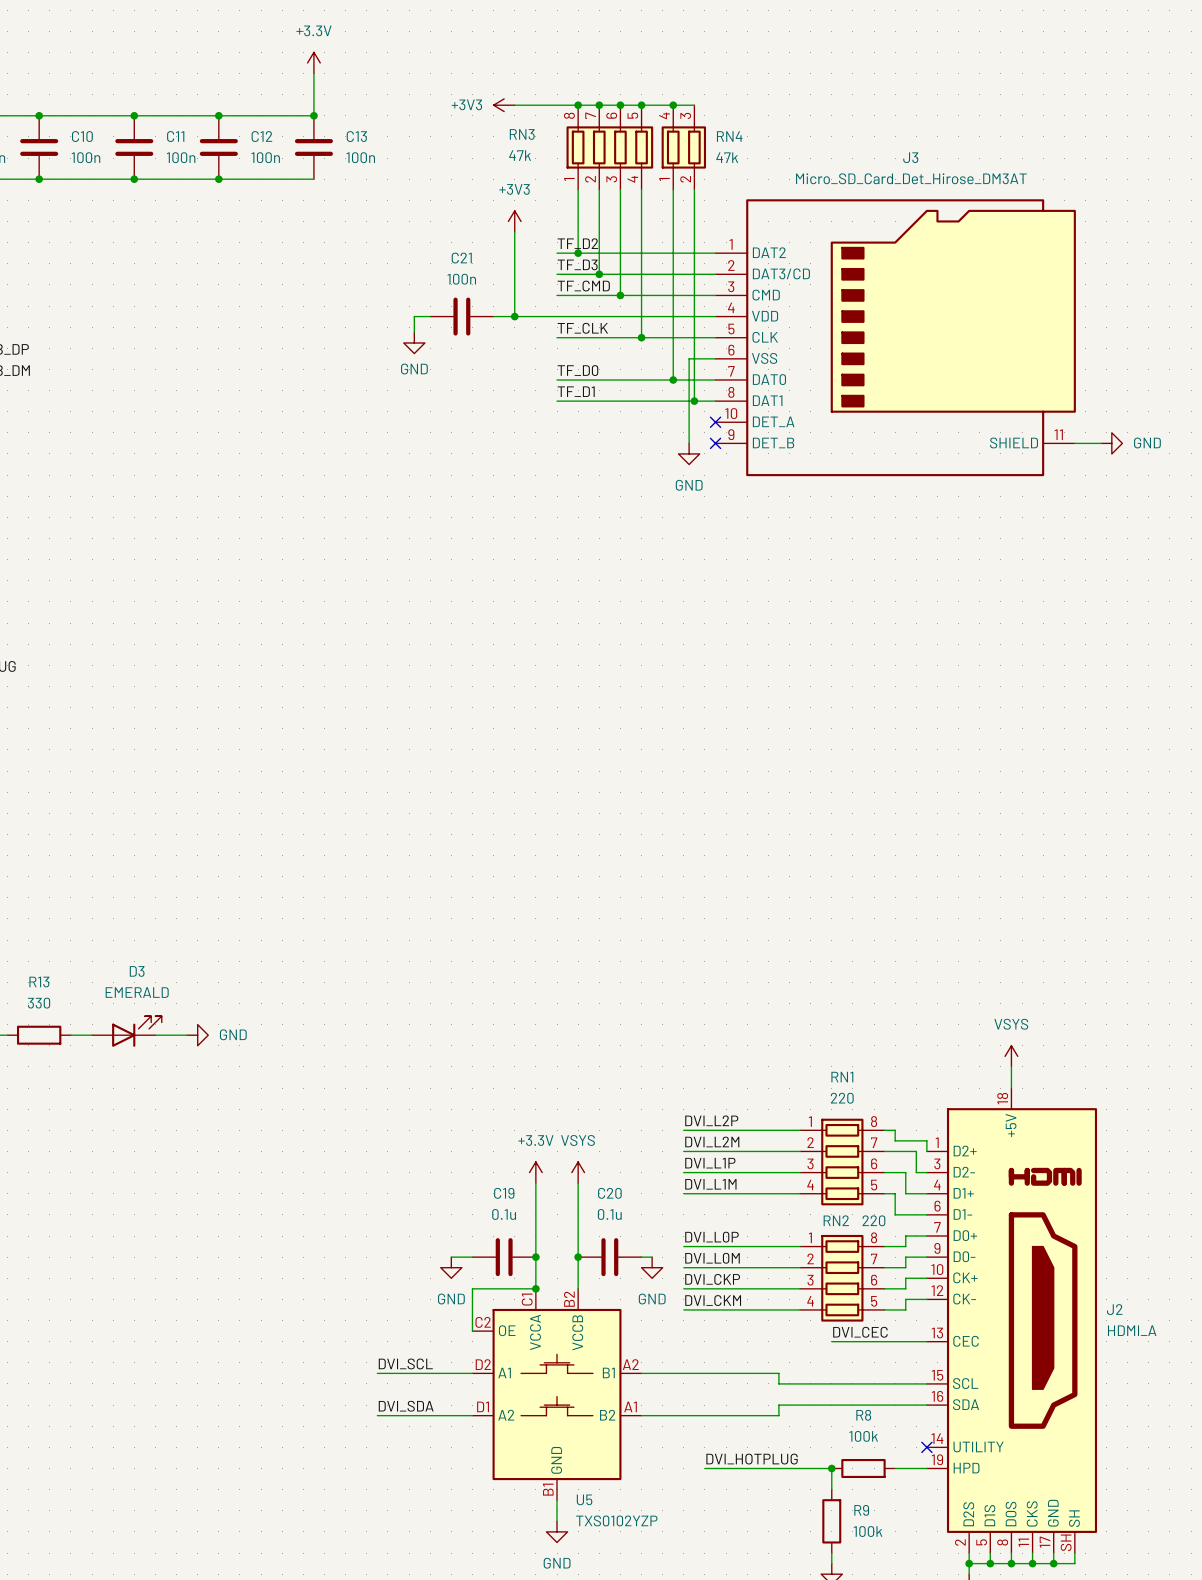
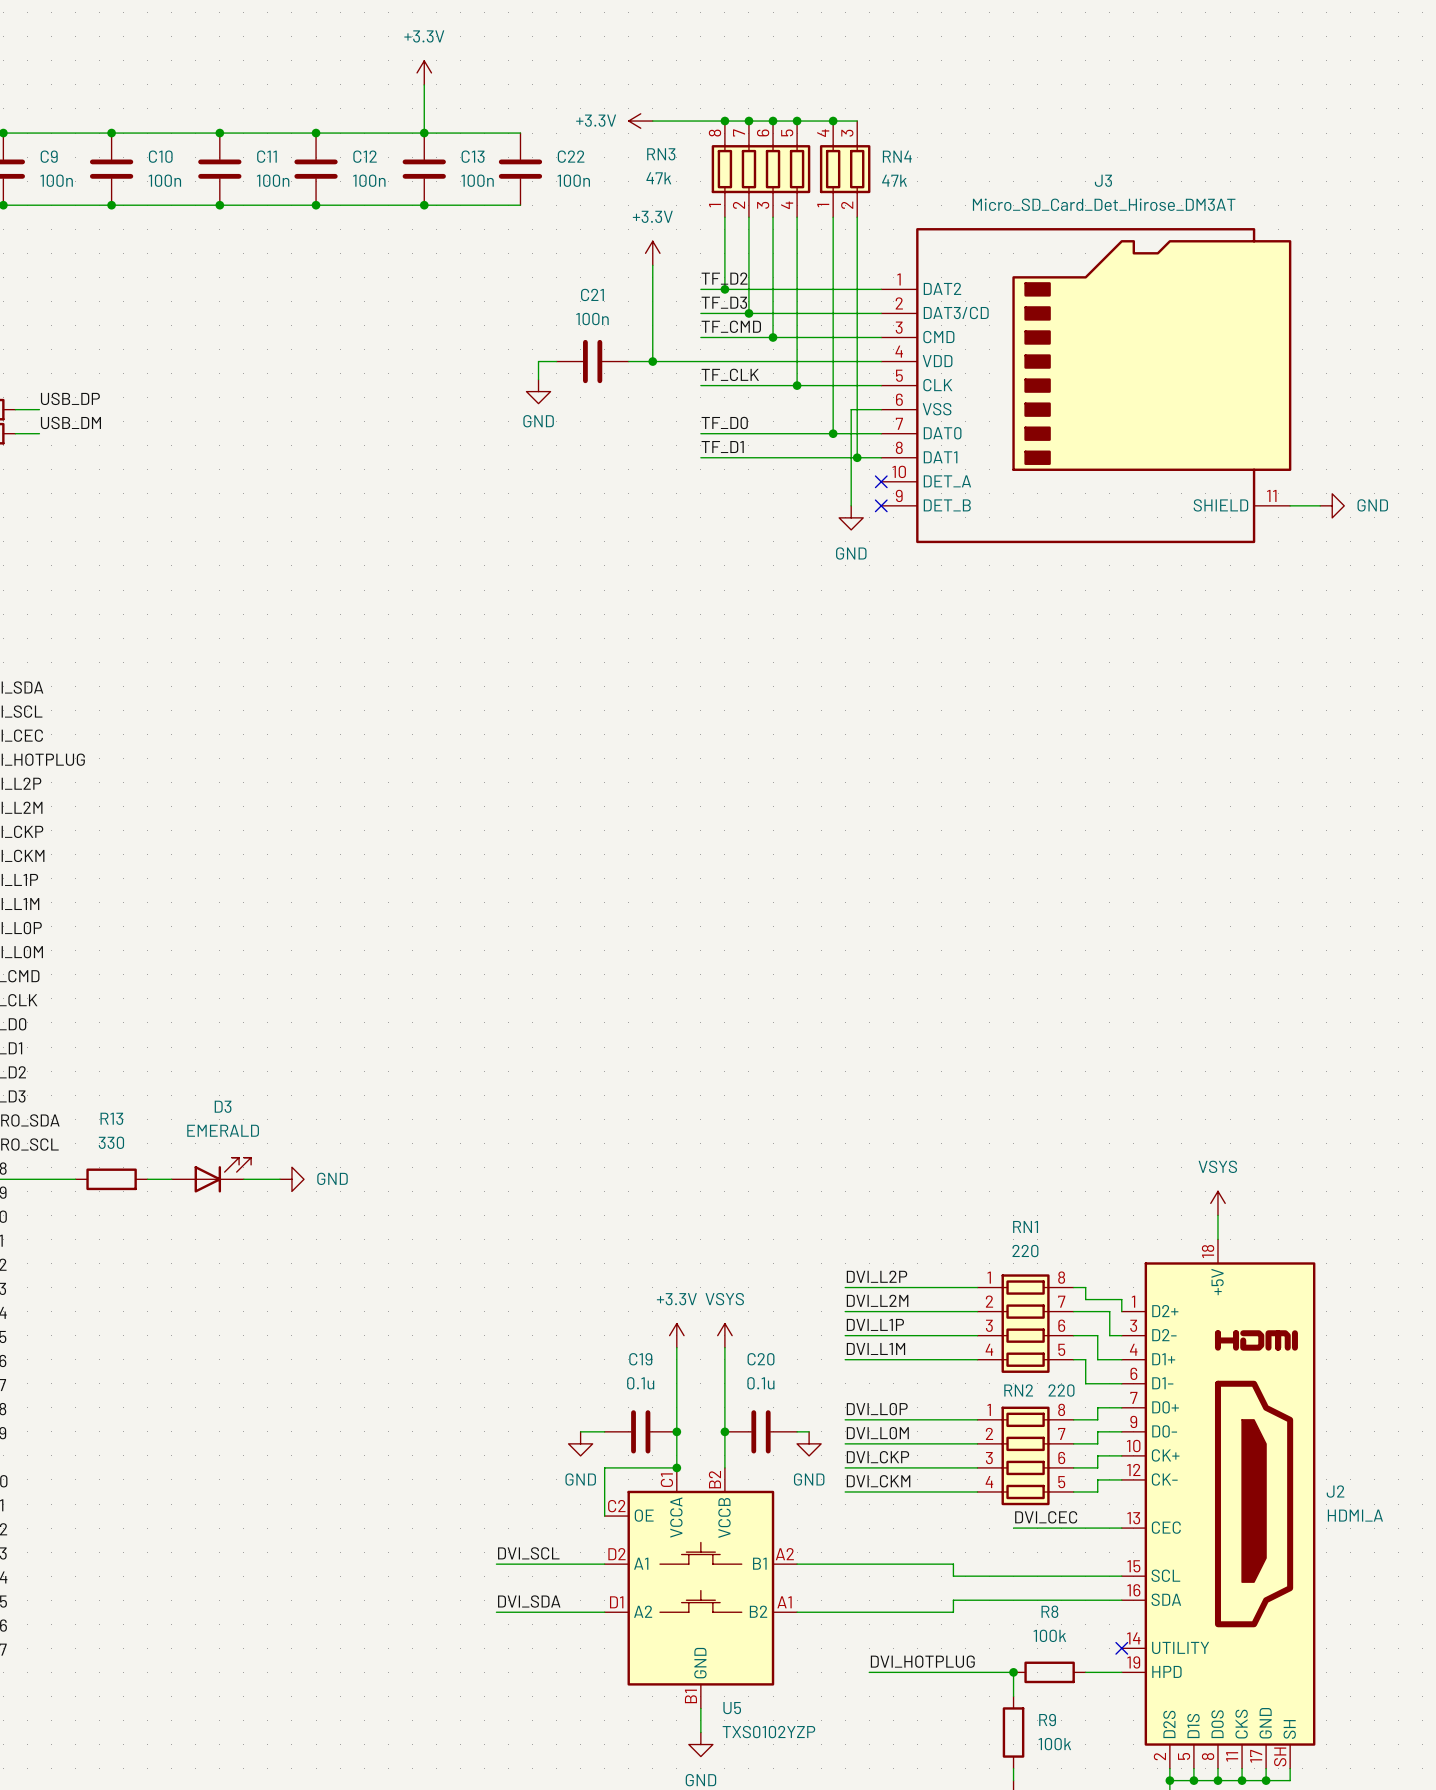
power symbol: +3V3 (504, 105) -> +3.3V (640, 121)
wire: none -> (424, 133) (520, 133)
C22: none -> 100n (520, 169)
wire: none -> (424, 205) (520, 205)
junction: none -> (424, 205)
power symbol: +3V3 (514, 221) -> +3.3V (652, 253)

